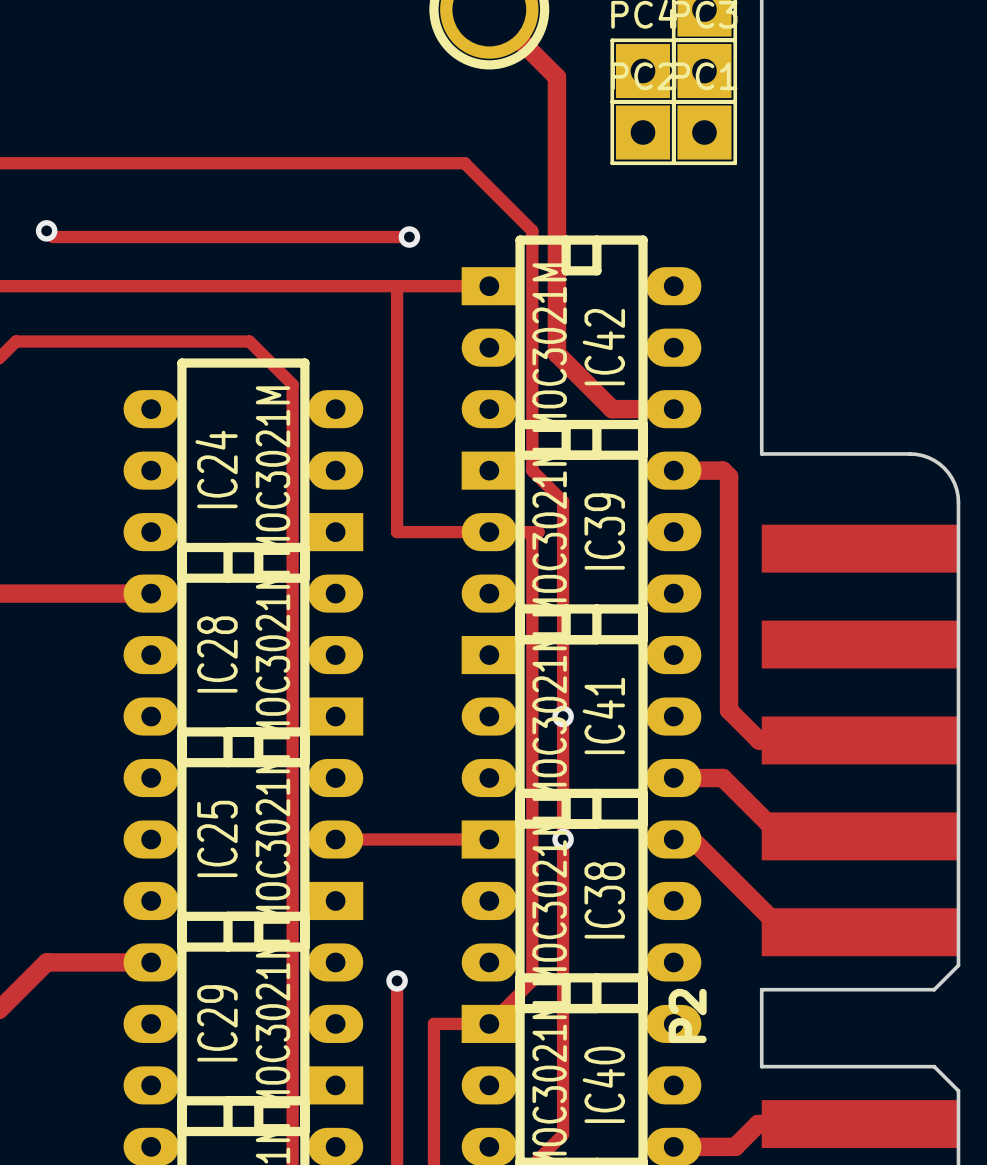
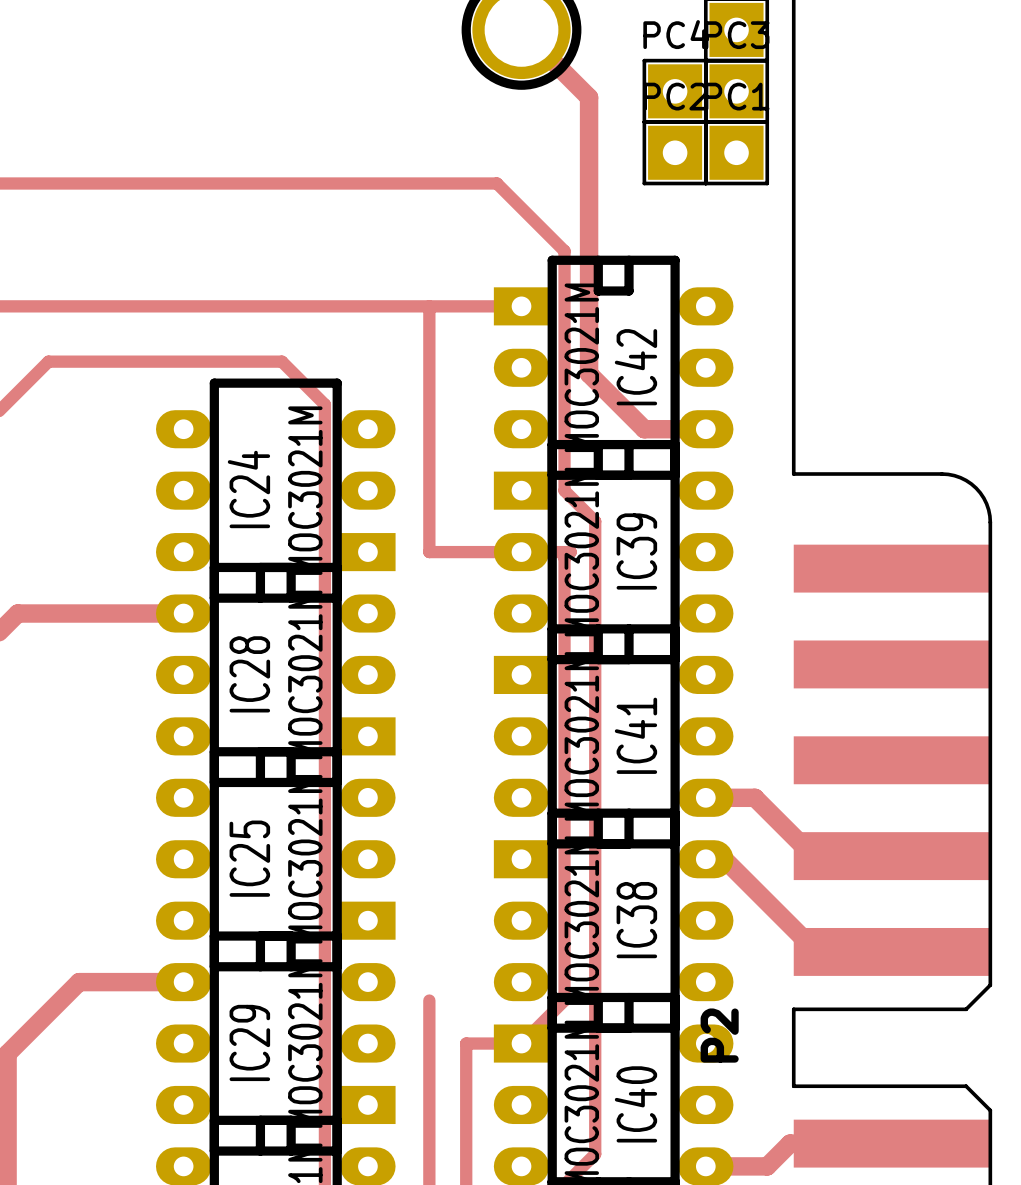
via: (46, 230) -> none
track: (52, 237) (409, 237) -> none
via: (409, 237) -> none
track: (673, 470) (722, 470) (729, 476) (729, 710) (759, 740) (860, 740) -> none
via: (563, 716) -> none
track: (335, 839) (489, 839) -> none
via: (563, 839) -> none
via: (397, 980) -> none

